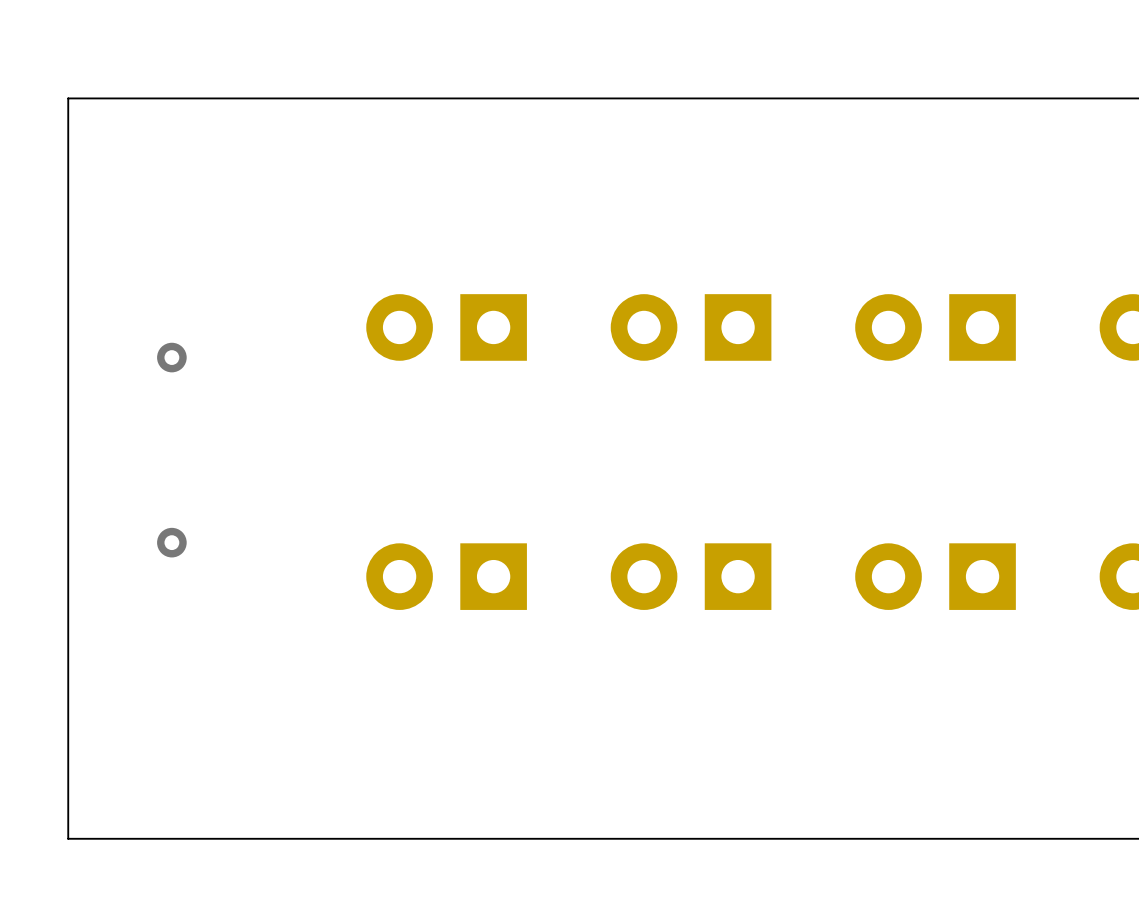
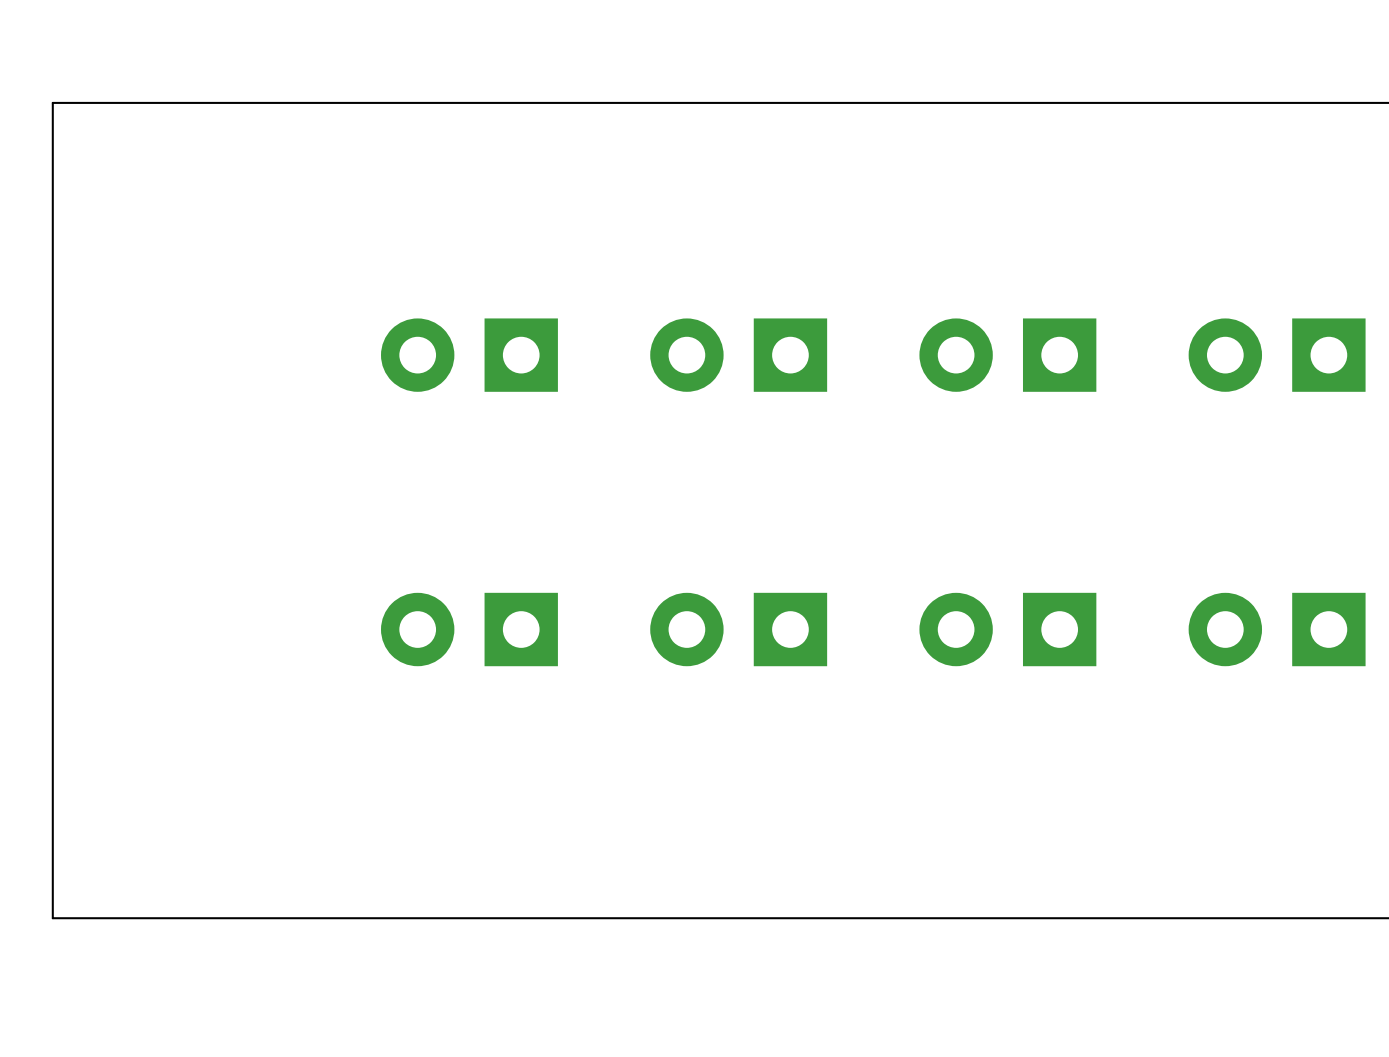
via: (171, 357) -> none
via: (171, 542) -> none

